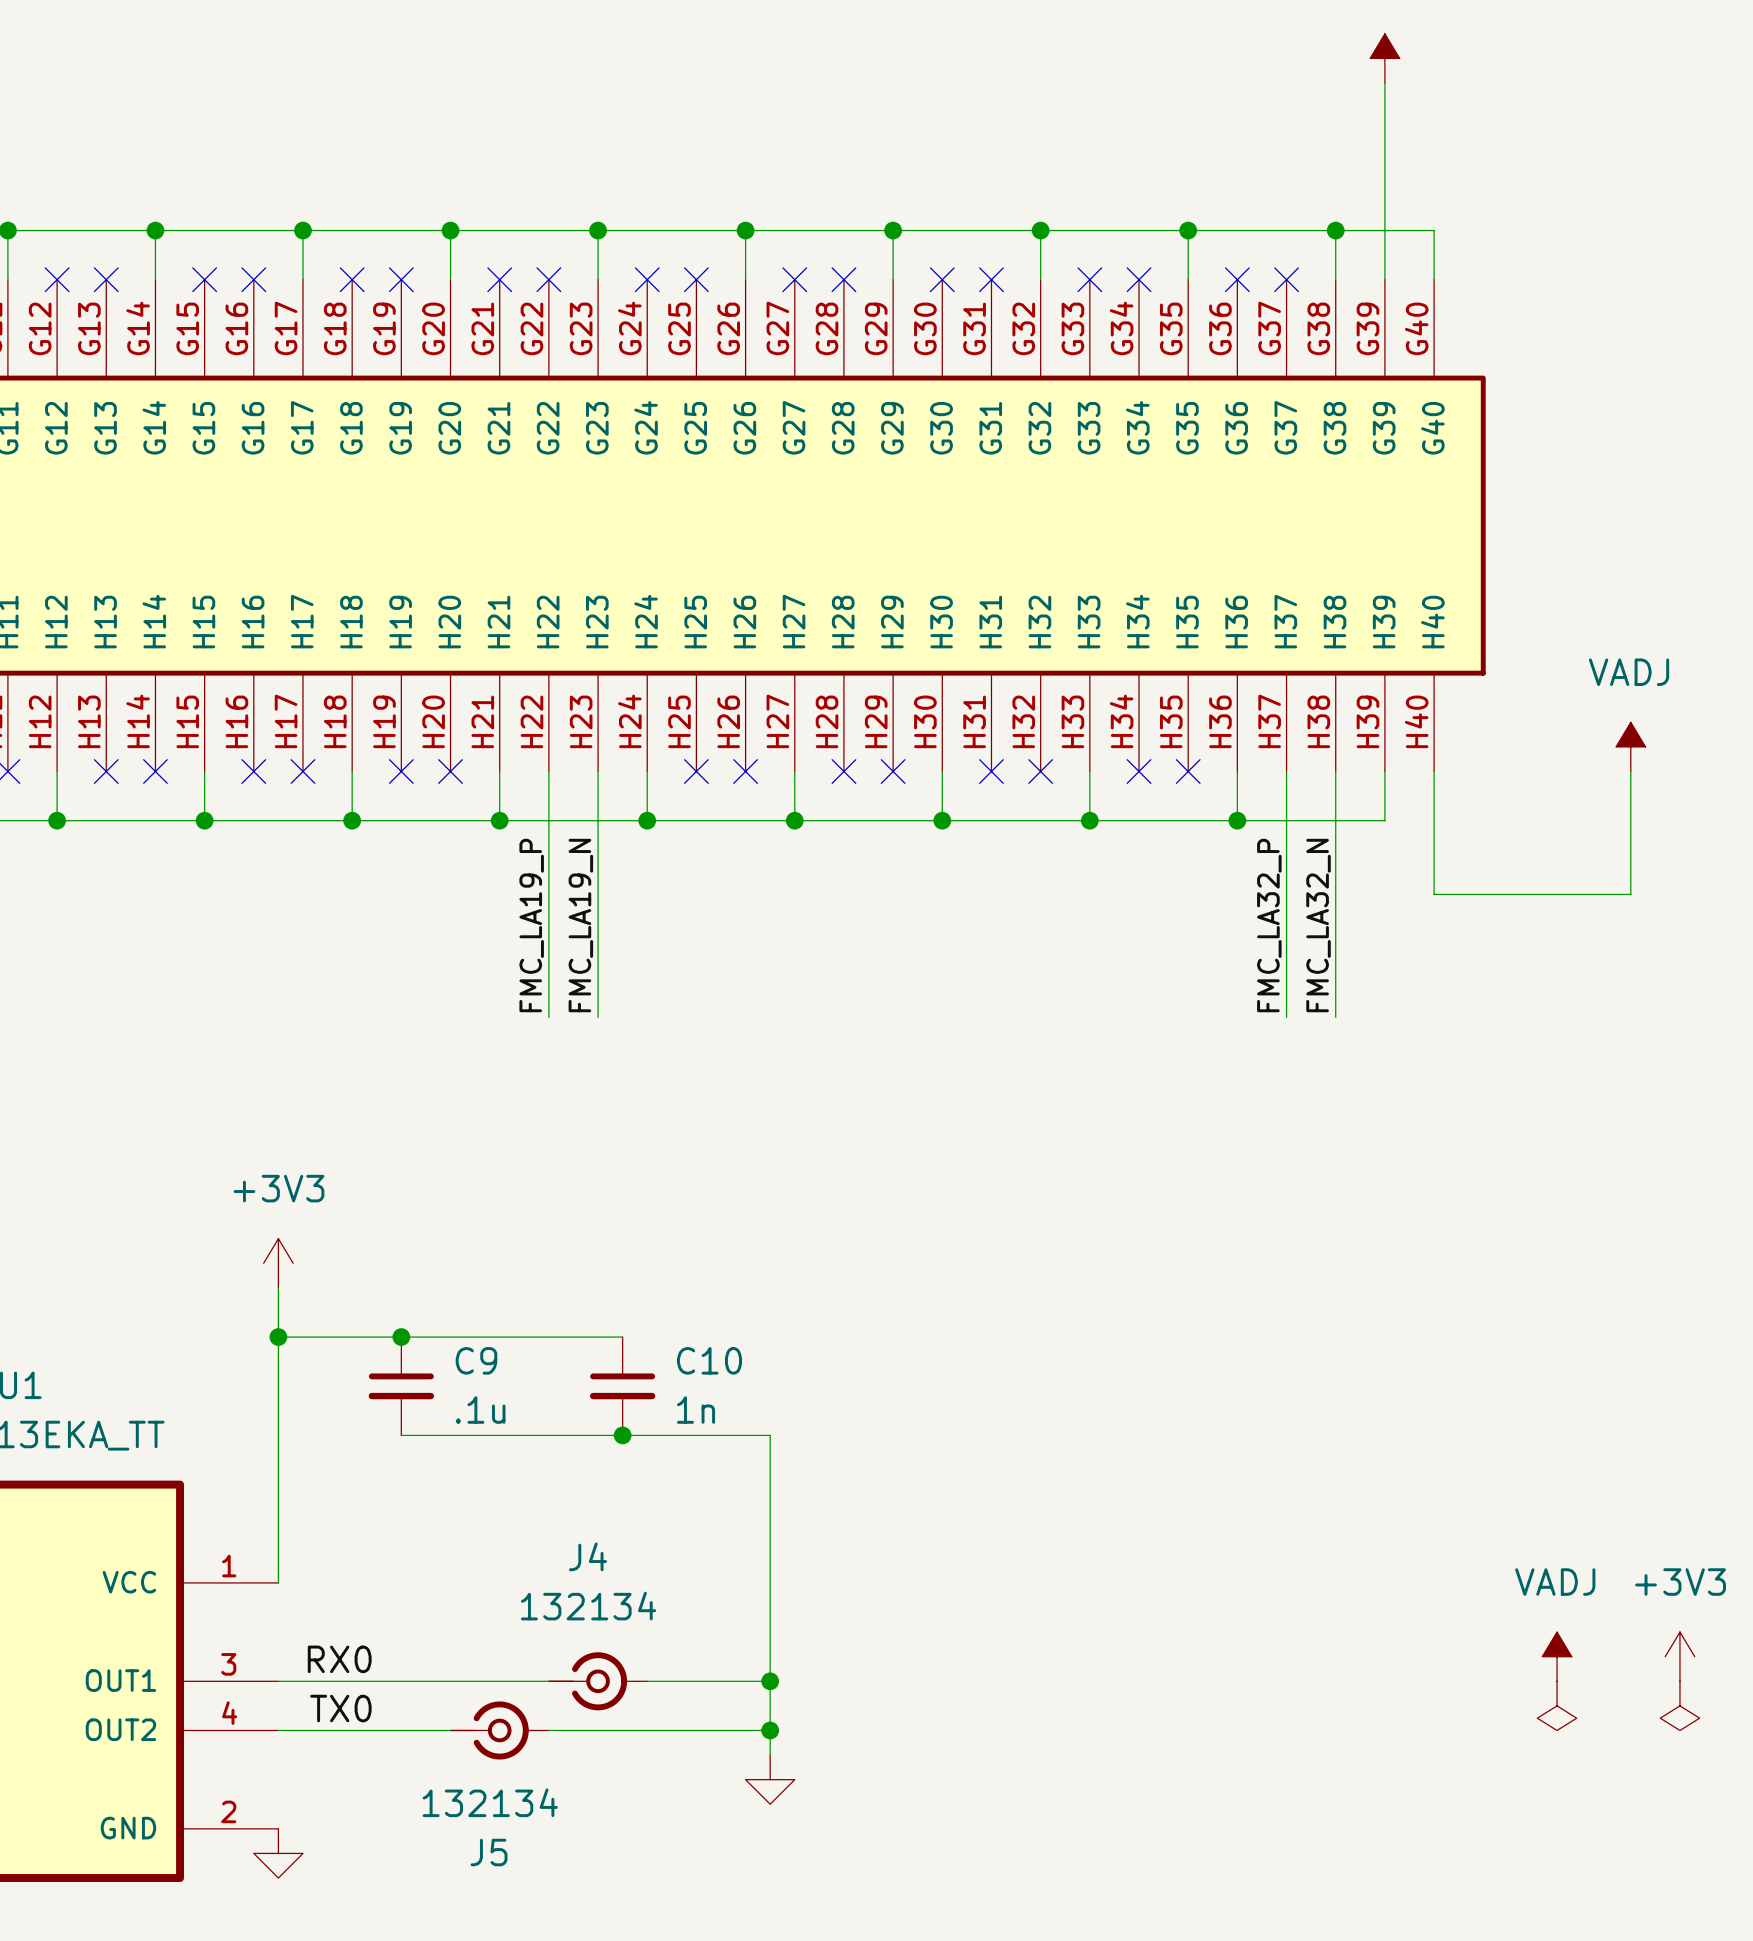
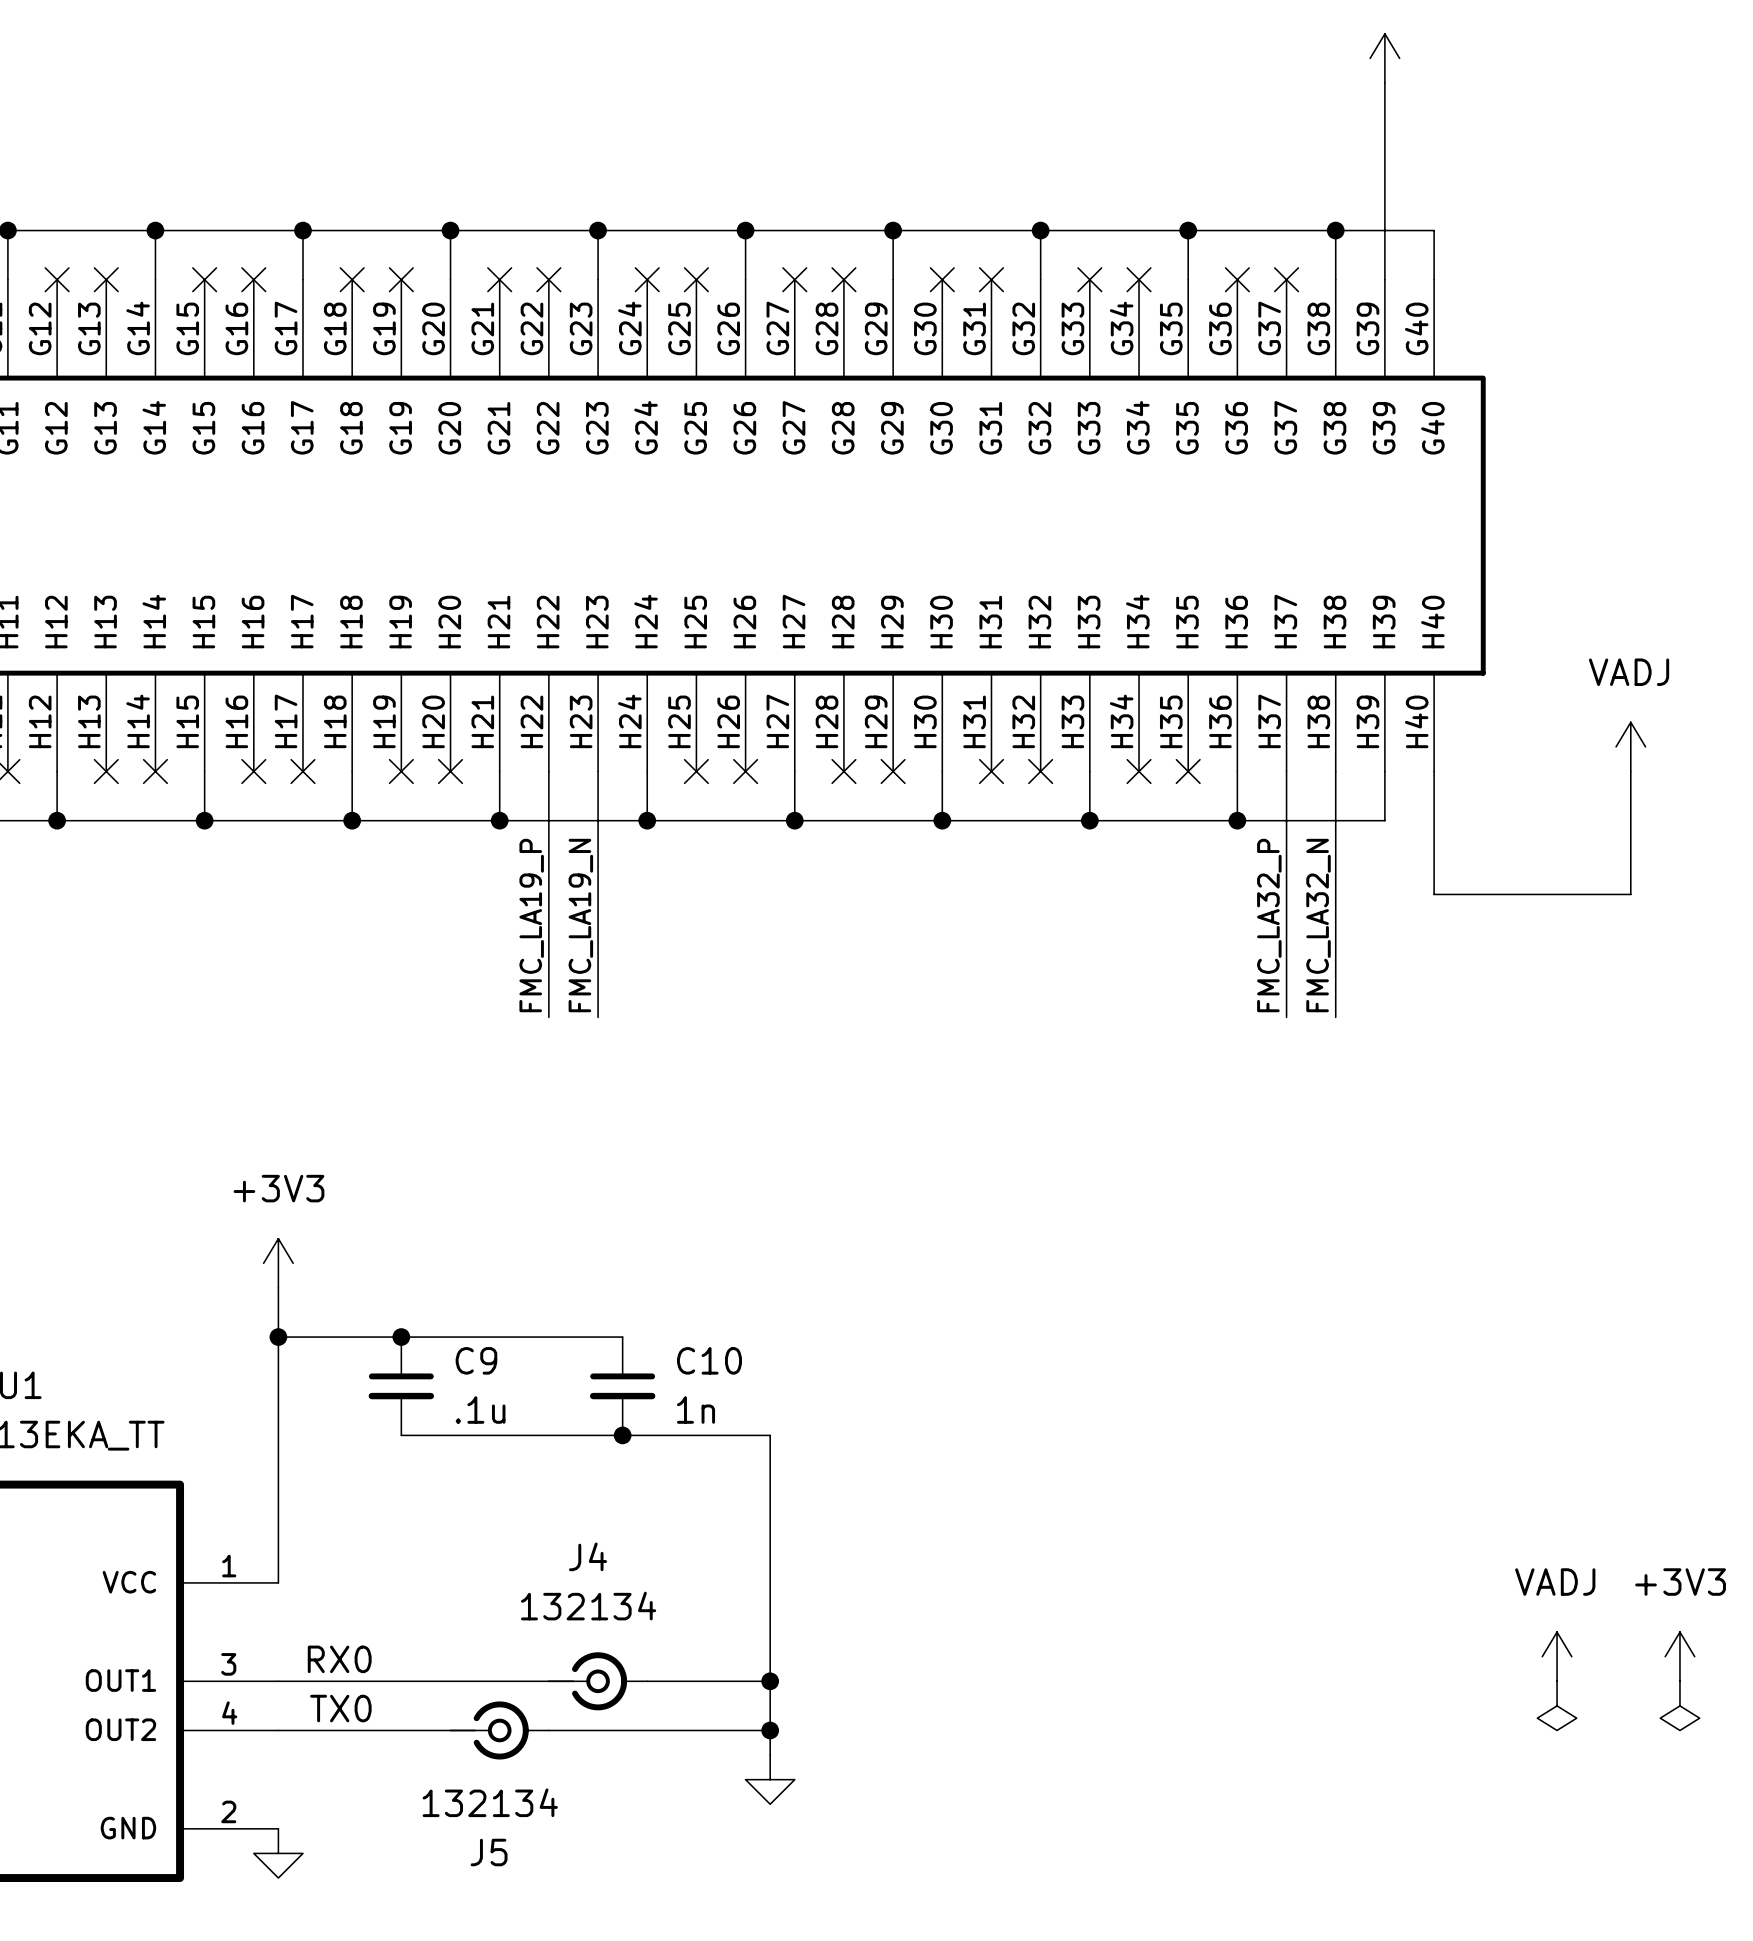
power symbol shape: [1370, 33, 1400, 84] -> [1370, 33, 1400, 84]
power symbol shape: [1616, 722, 1646, 772] -> [1616, 722, 1646, 772]
power symbol shape: [1542, 1632, 1572, 1682] -> [1542, 1632, 1572, 1682]

